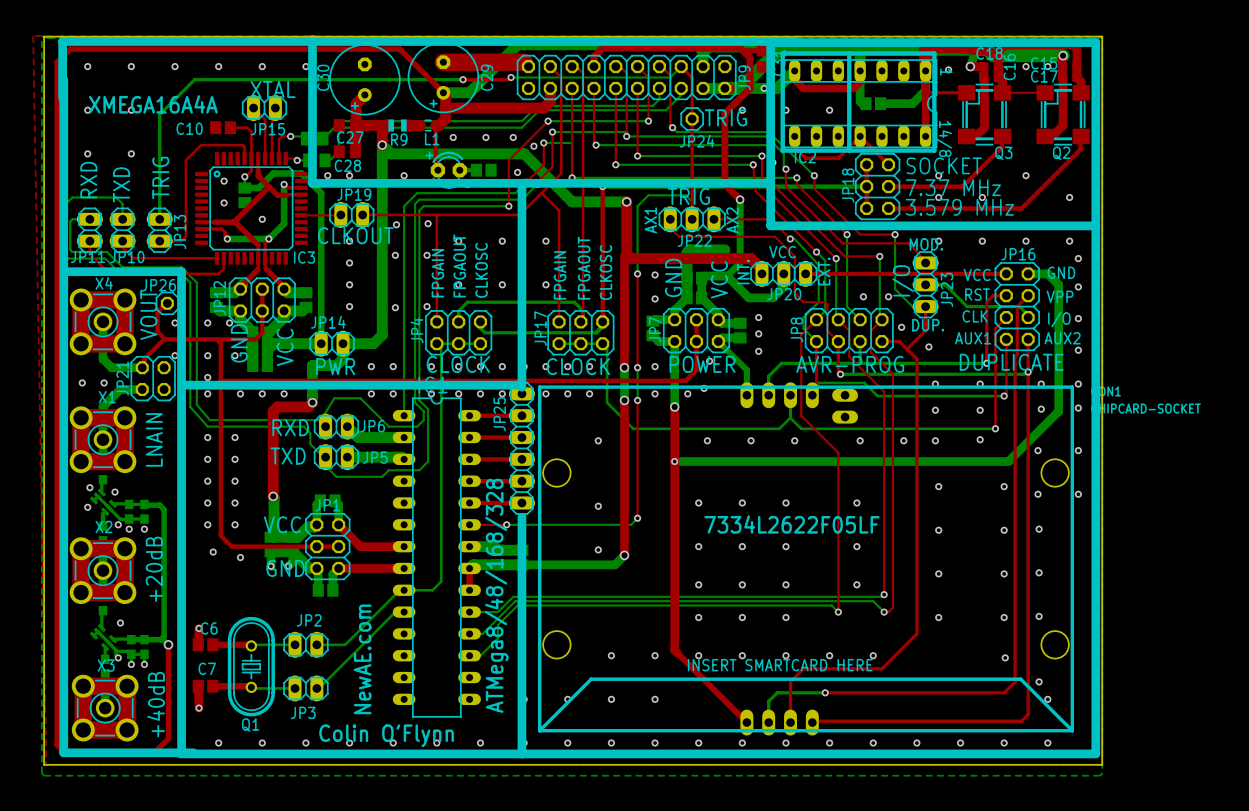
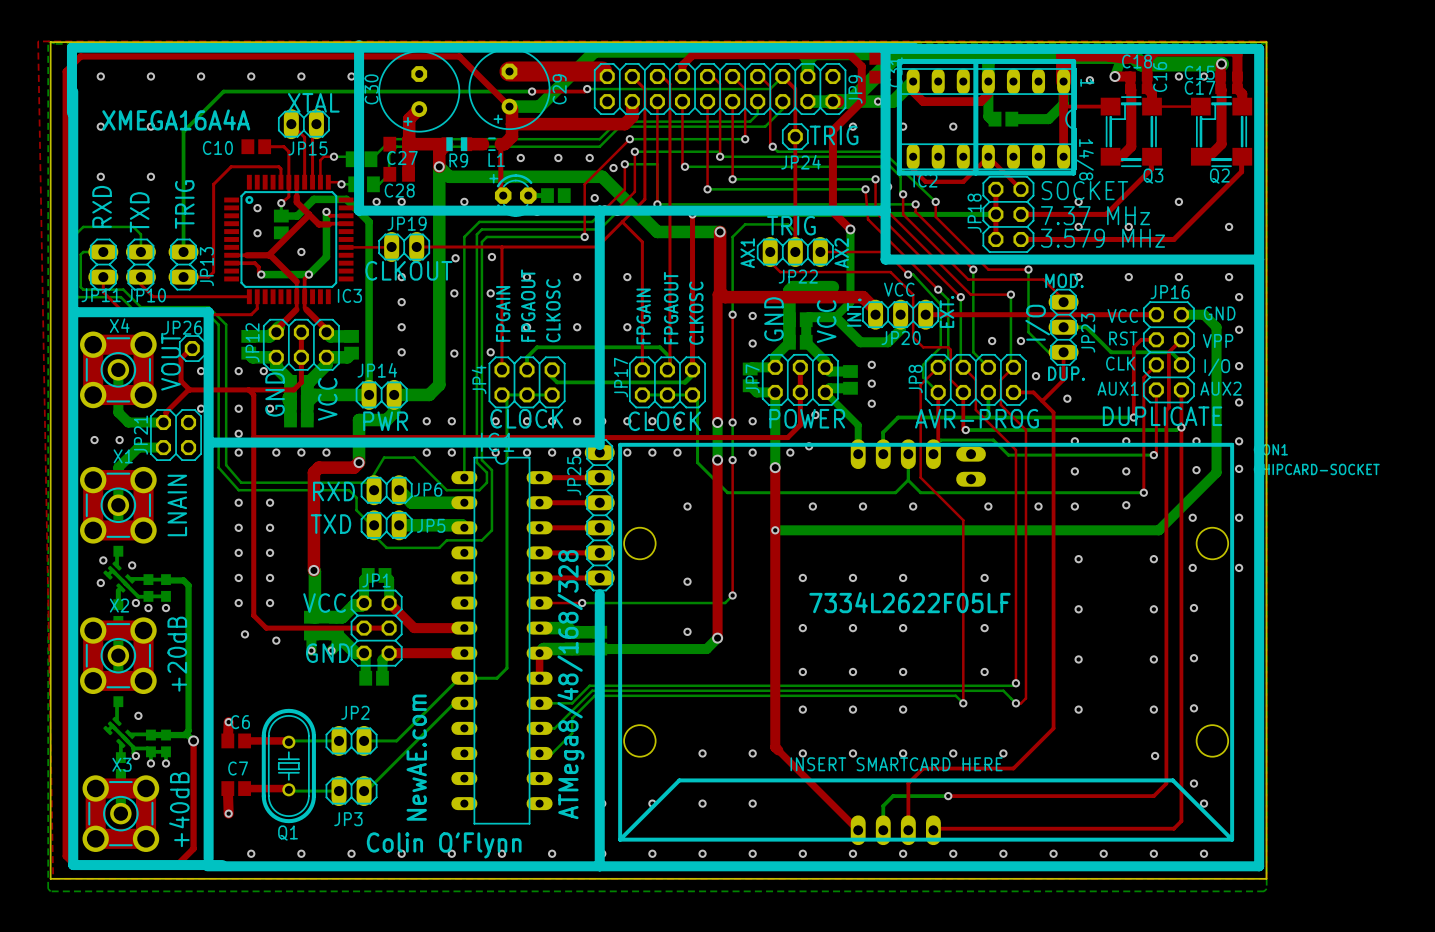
top track: (763, 50) (746, 50) (746, 54) -> none

